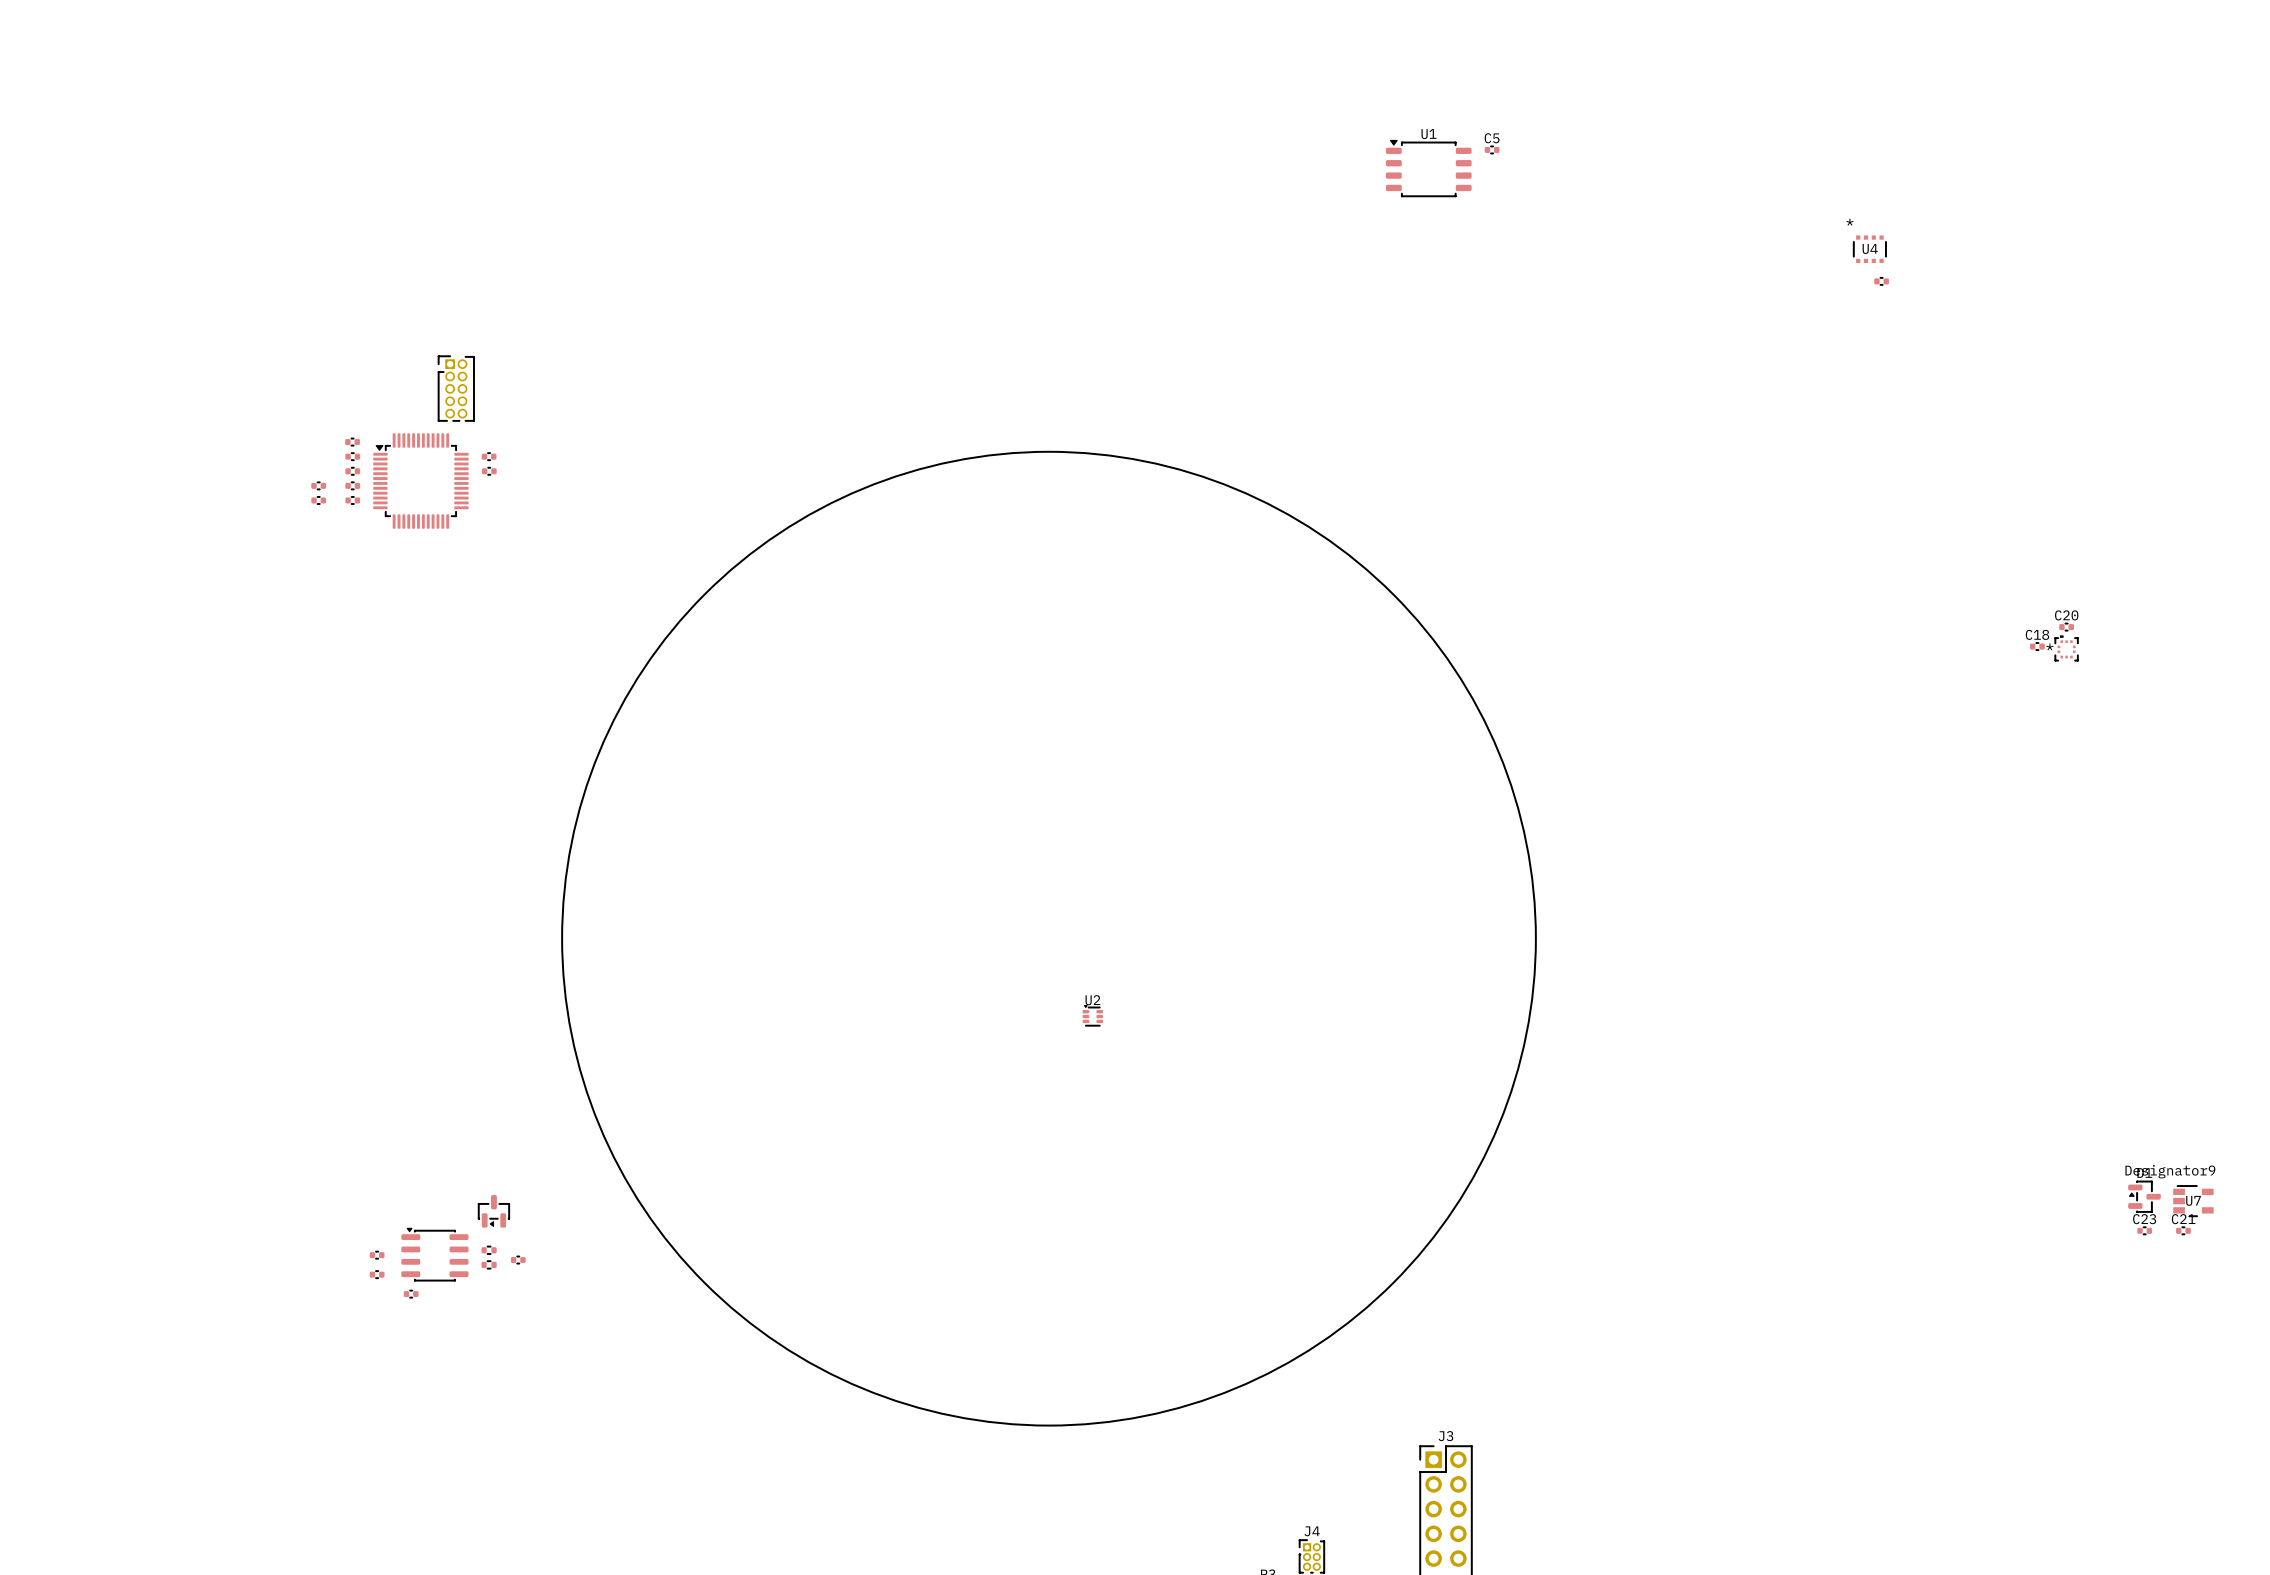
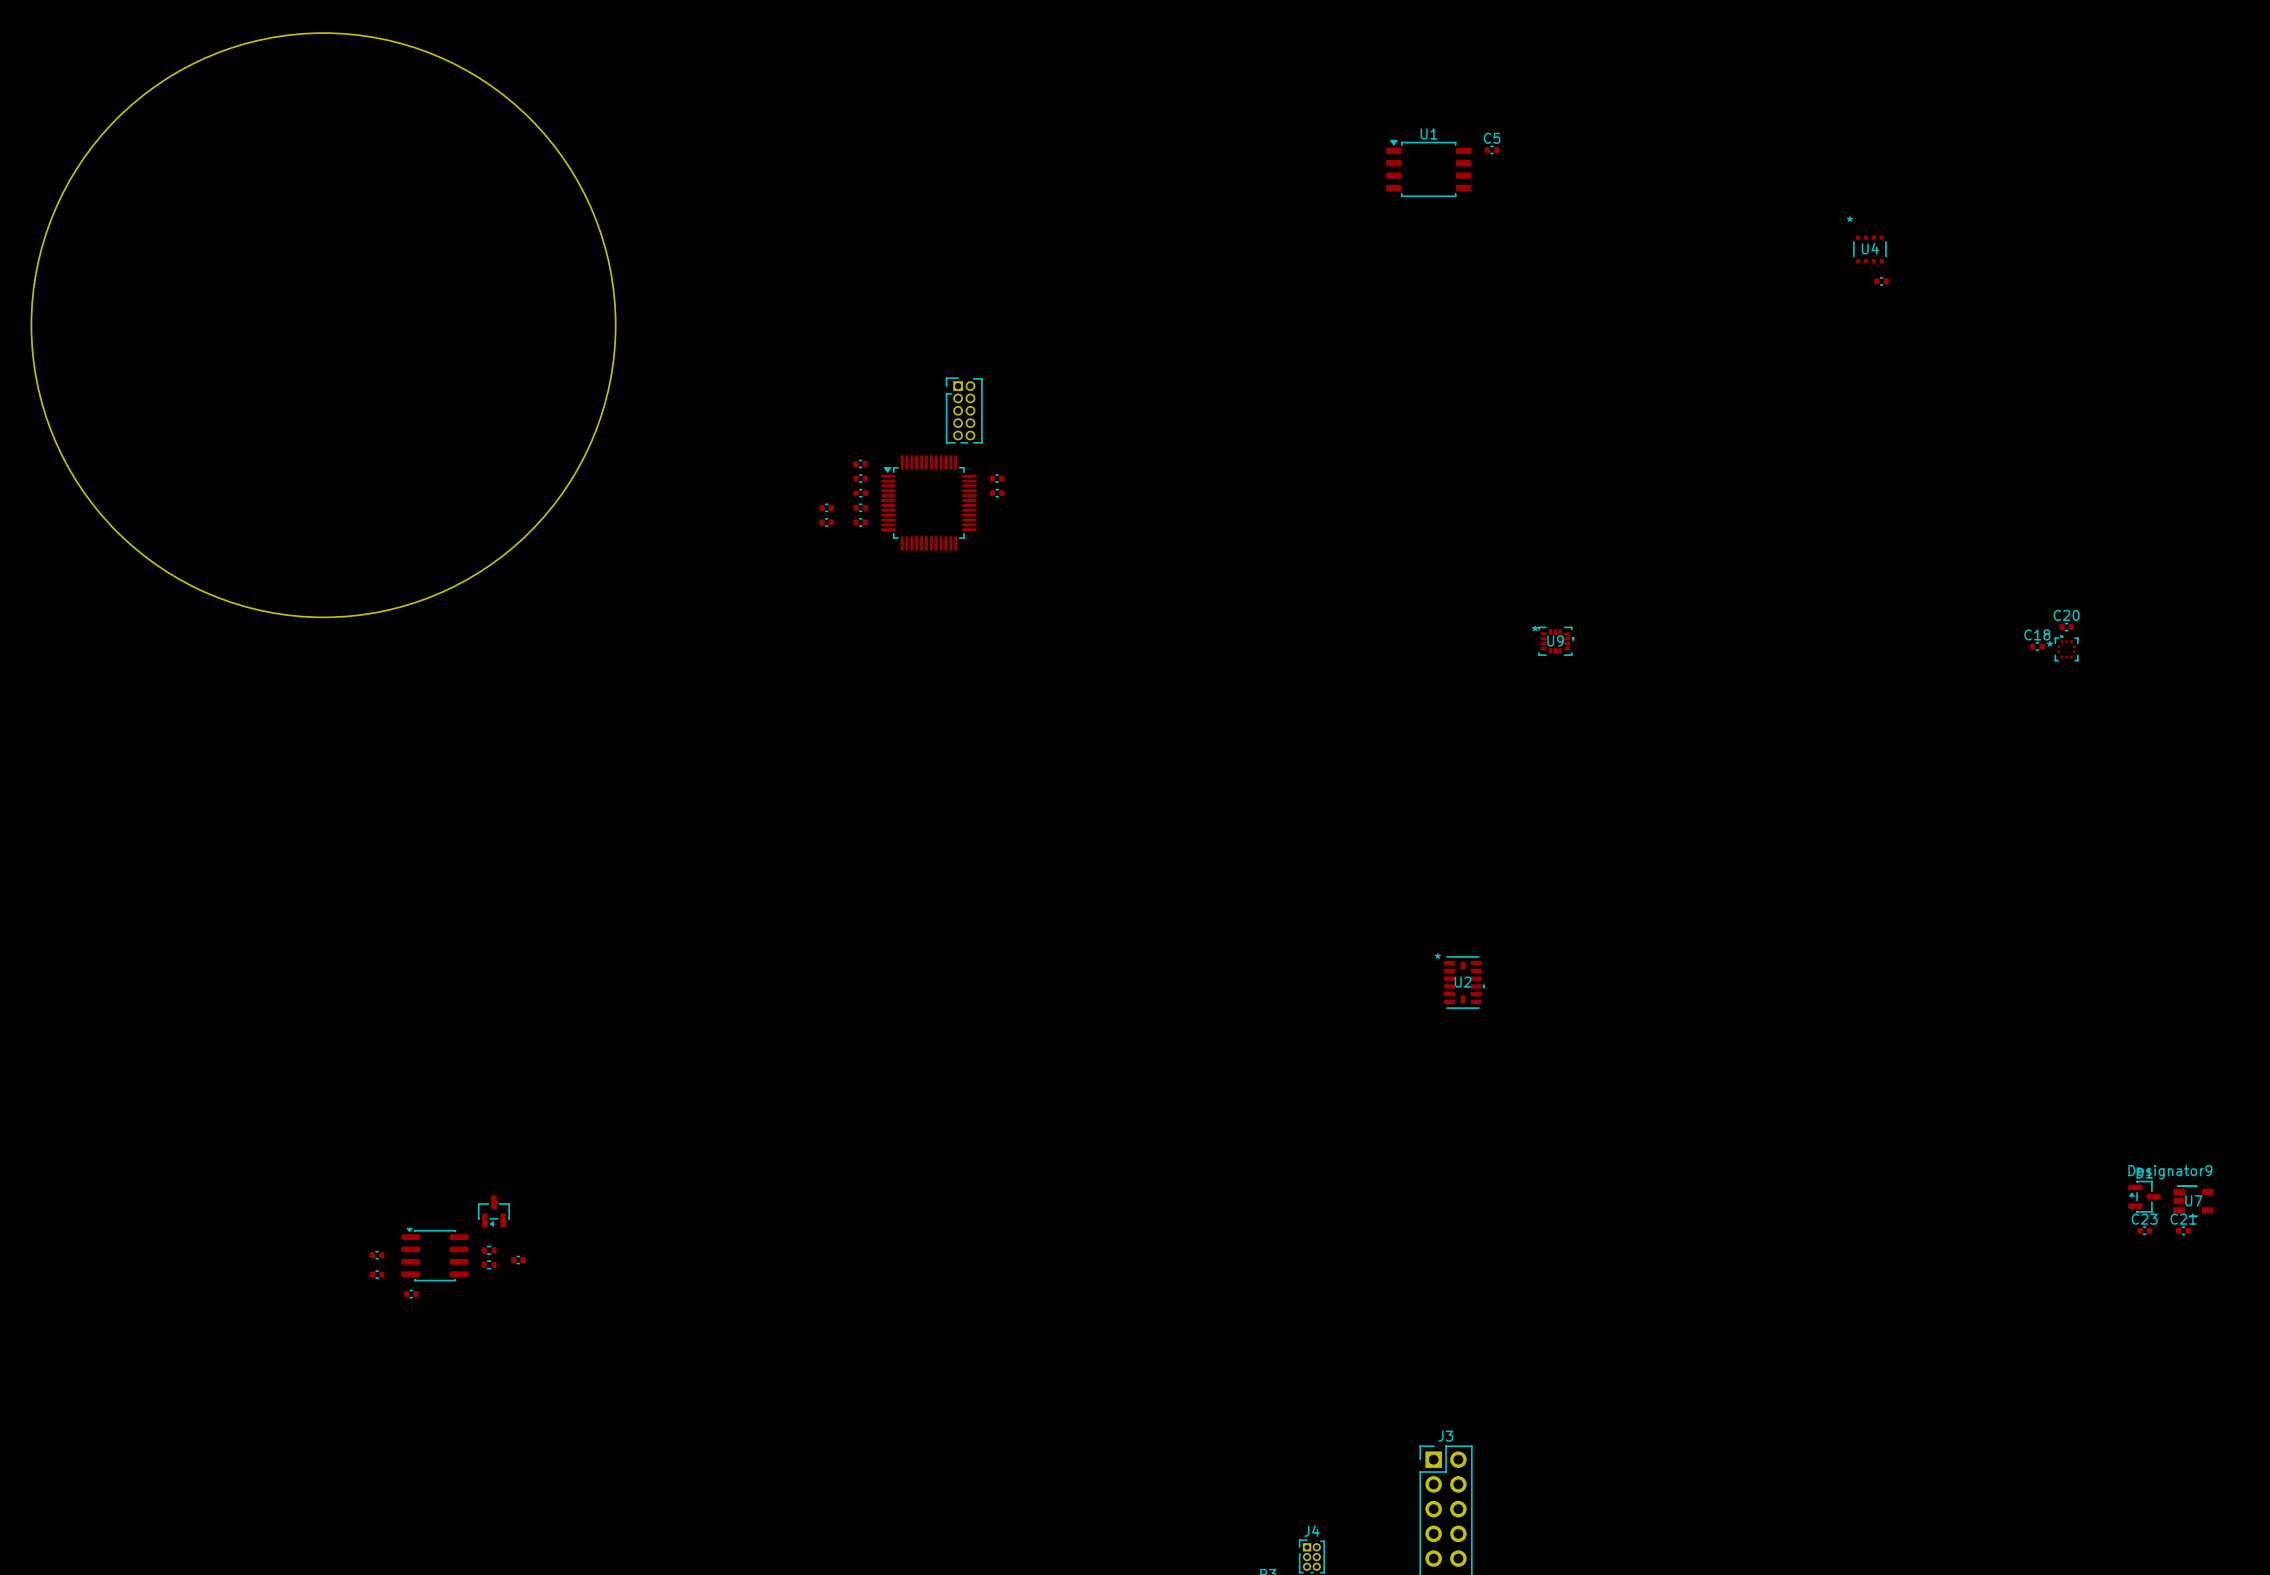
round board edge: none -> [31, 32, 616, 618]
part: (456, 388) -> none
part: none -> (964, 410)
part: (352, 442) -> none
round board edge: [561, 451, 1537, 1426] -> none
part: (352, 456) -> none
part: (489, 456) -> none
part: none -> (860, 463)
part: (352, 471) -> none
part: (489, 471) -> none
part: none -> (860, 478)
part: none -> (997, 478)
part: (420, 481) -> none
part: (318, 485) -> none
part: (352, 485) -> none
part: none -> (860, 493)
part: none -> (997, 493)
part: (318, 500) -> none
part: (352, 500) -> none
part: none -> (928, 502)
part: none -> (826, 507)
part: none -> (860, 507)
part: none -> (826, 522)
part: none -> (860, 522)
U9: none -> (1556, 641)
U2 footprint: [1082, 1005, 1104, 1027] -> [1444, 956, 1486, 1009]

